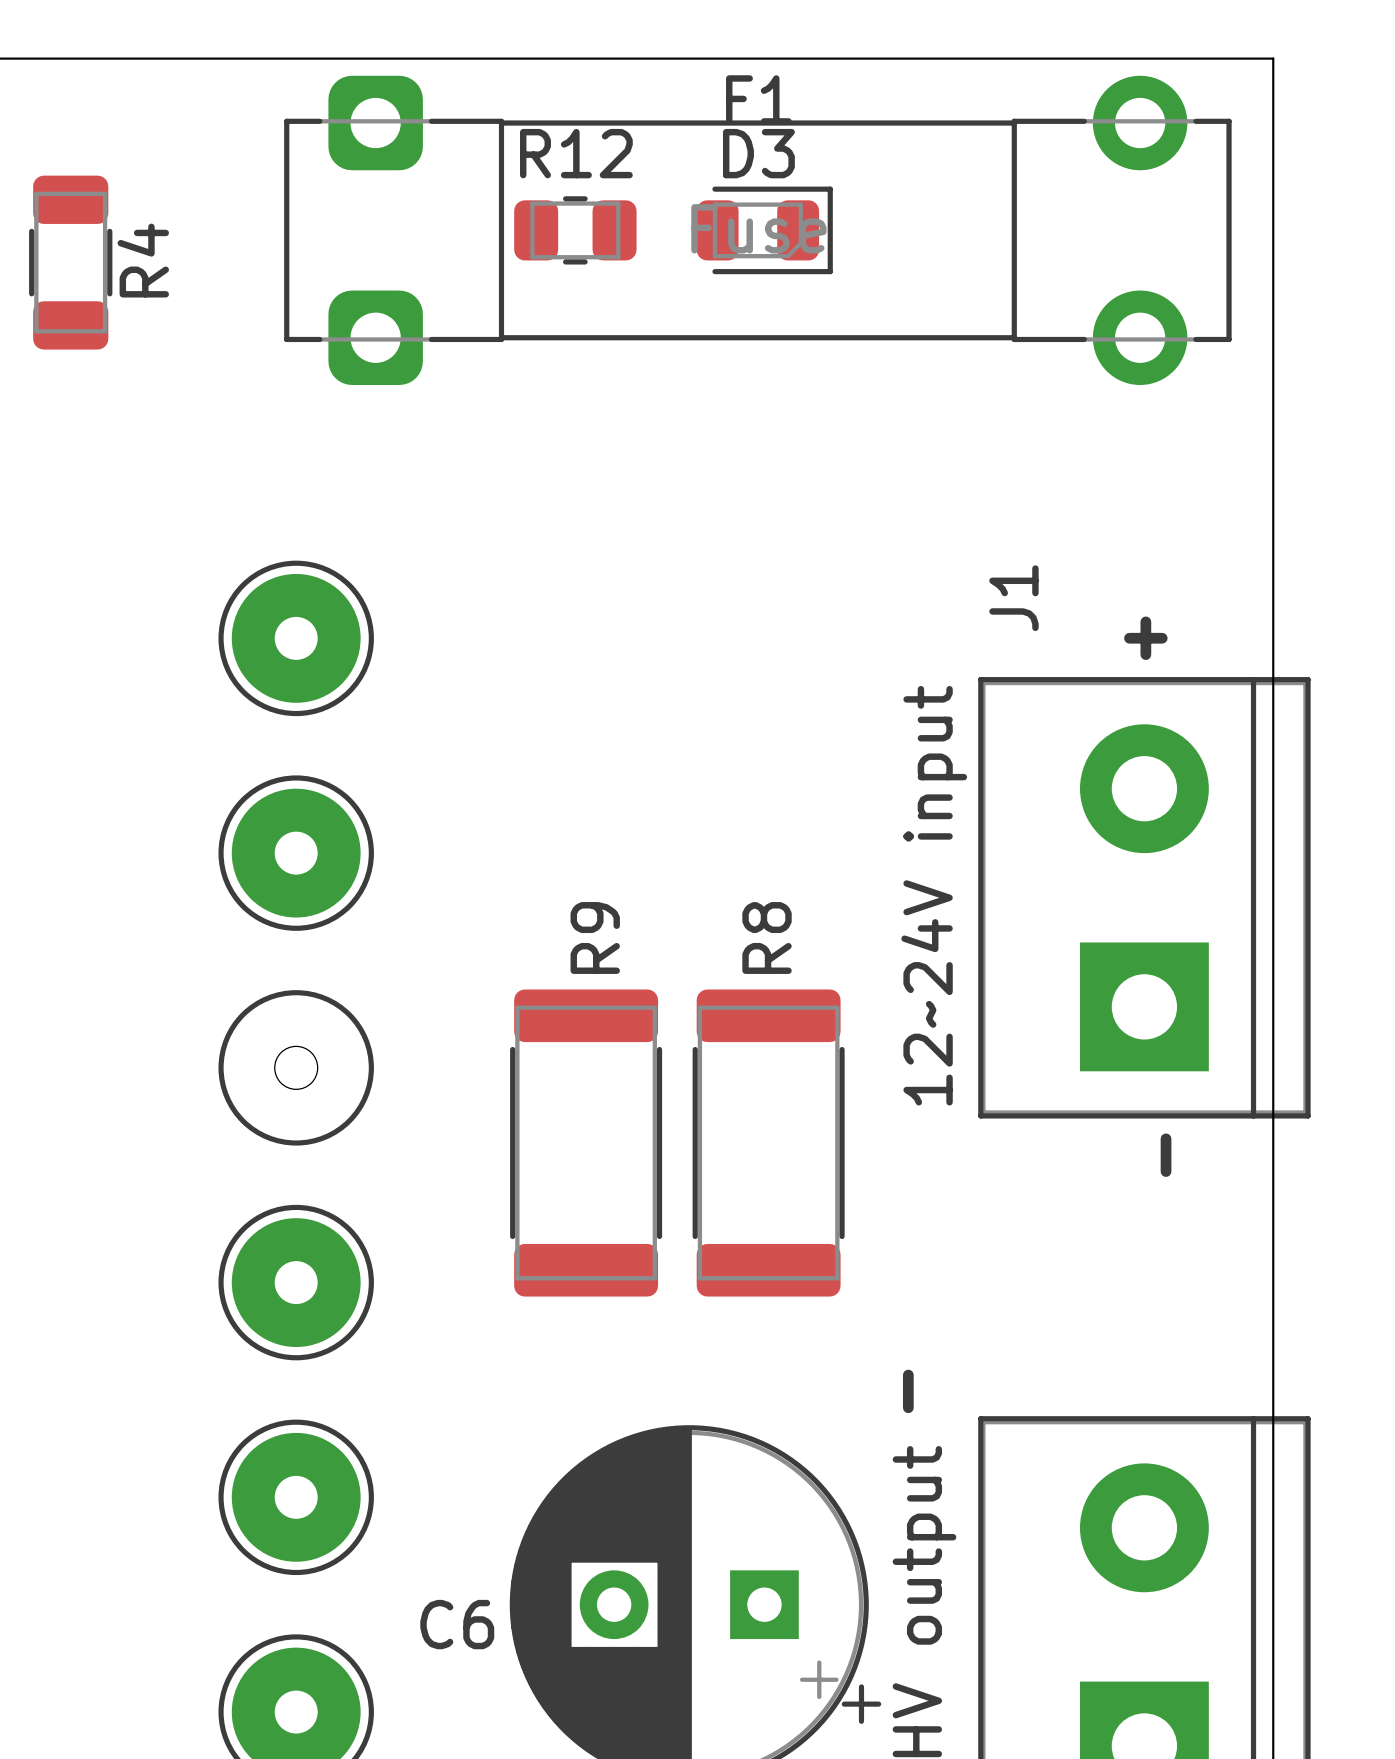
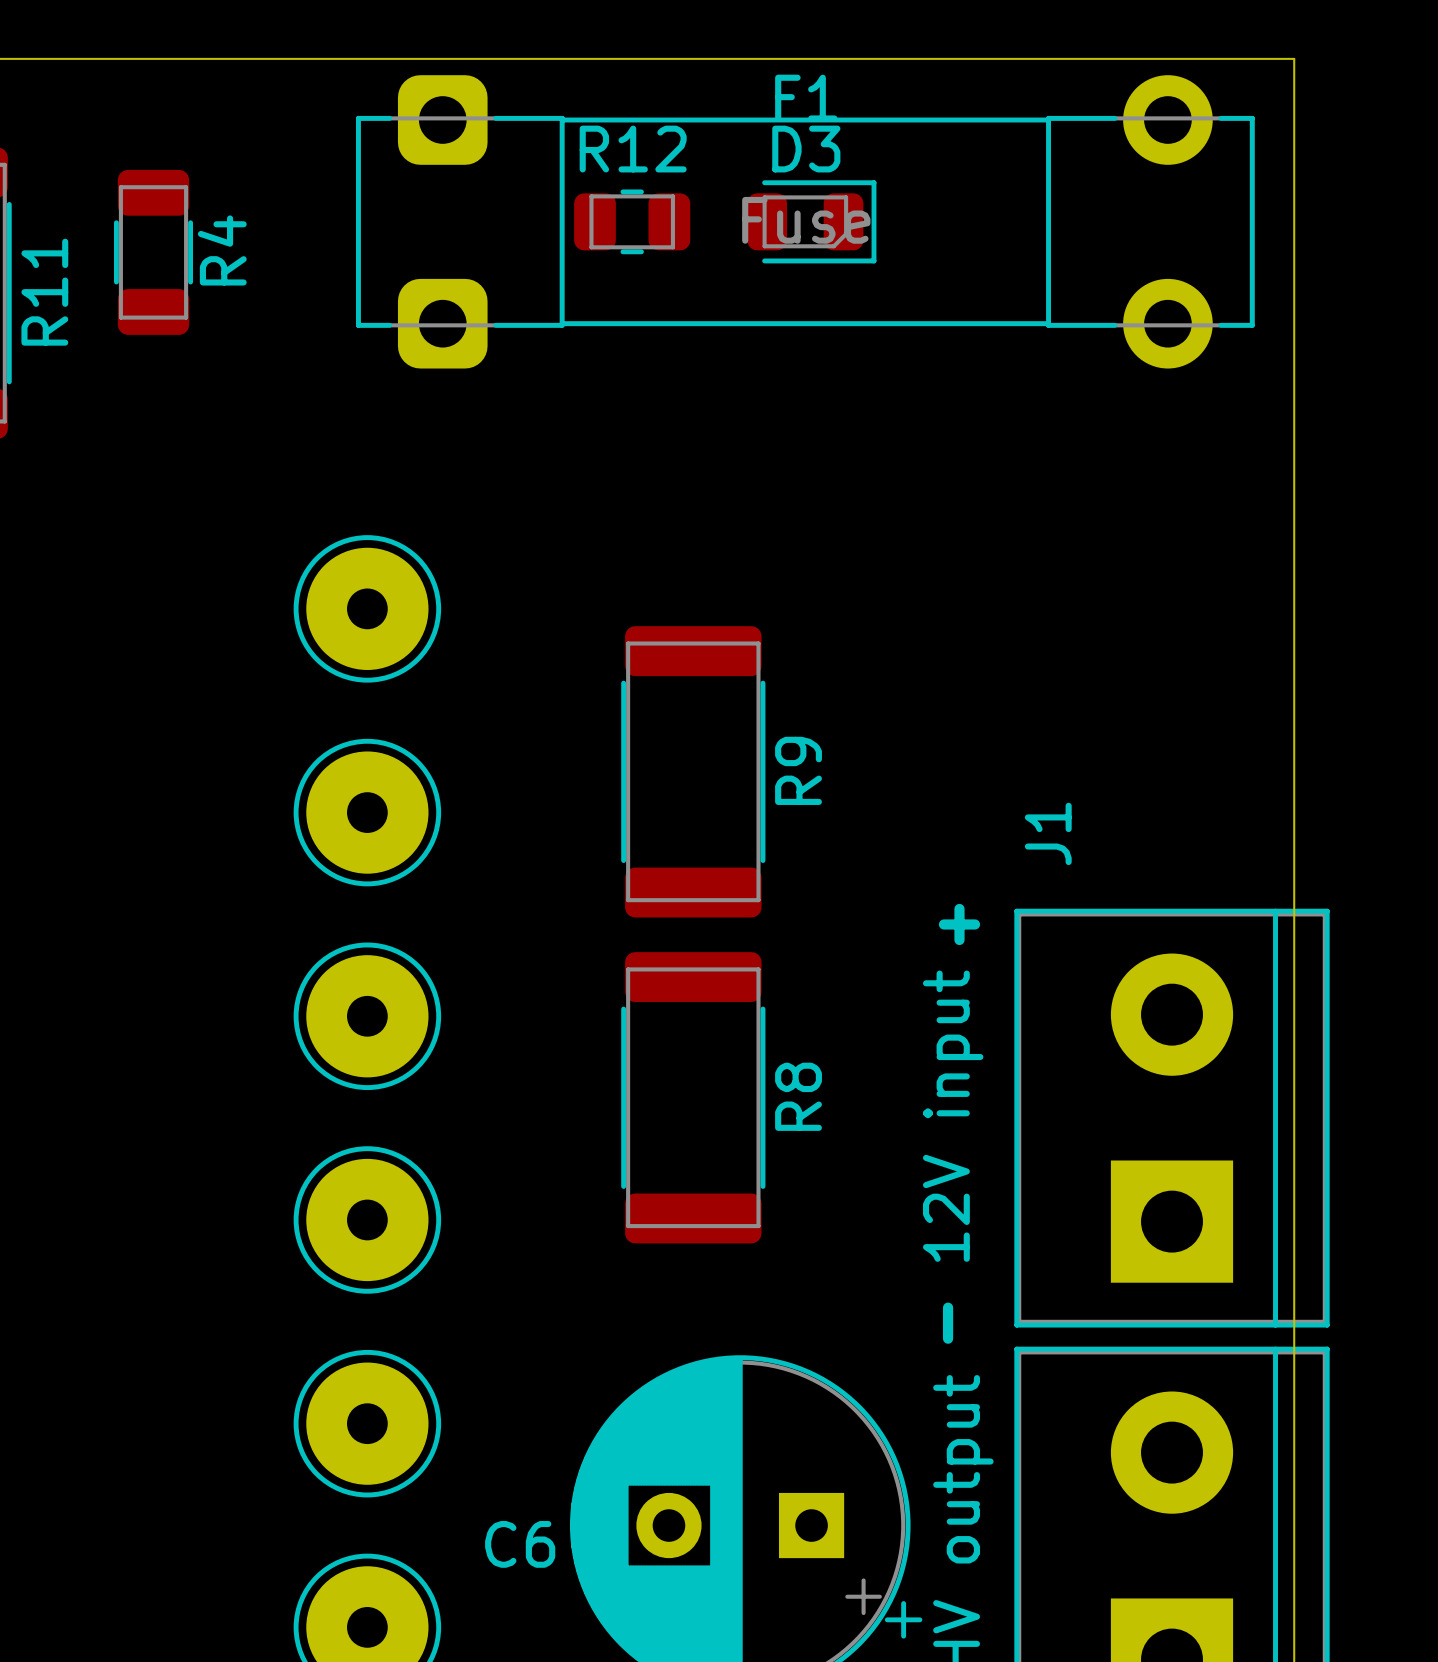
text position: + (1145, 638) -> + (959, 924)
J1 value: 12~24V input (934, 895) -> 12V input (953, 1116)
J1 position: (1144, 897) -> (1172, 1118)
R9 name position: R9 (595, 937) -> R9 (798, 770)
R8 name position: R8 (767, 937) -> R8 (798, 1096)
part footprint: [218, 990, 374, 1146] -> [293, 942, 442, 1091]
R9 position: (586, 1143) -> (693, 771)
R8 position: (768, 1143) -> (693, 1097)
text: - (1166, 1155) -> none

